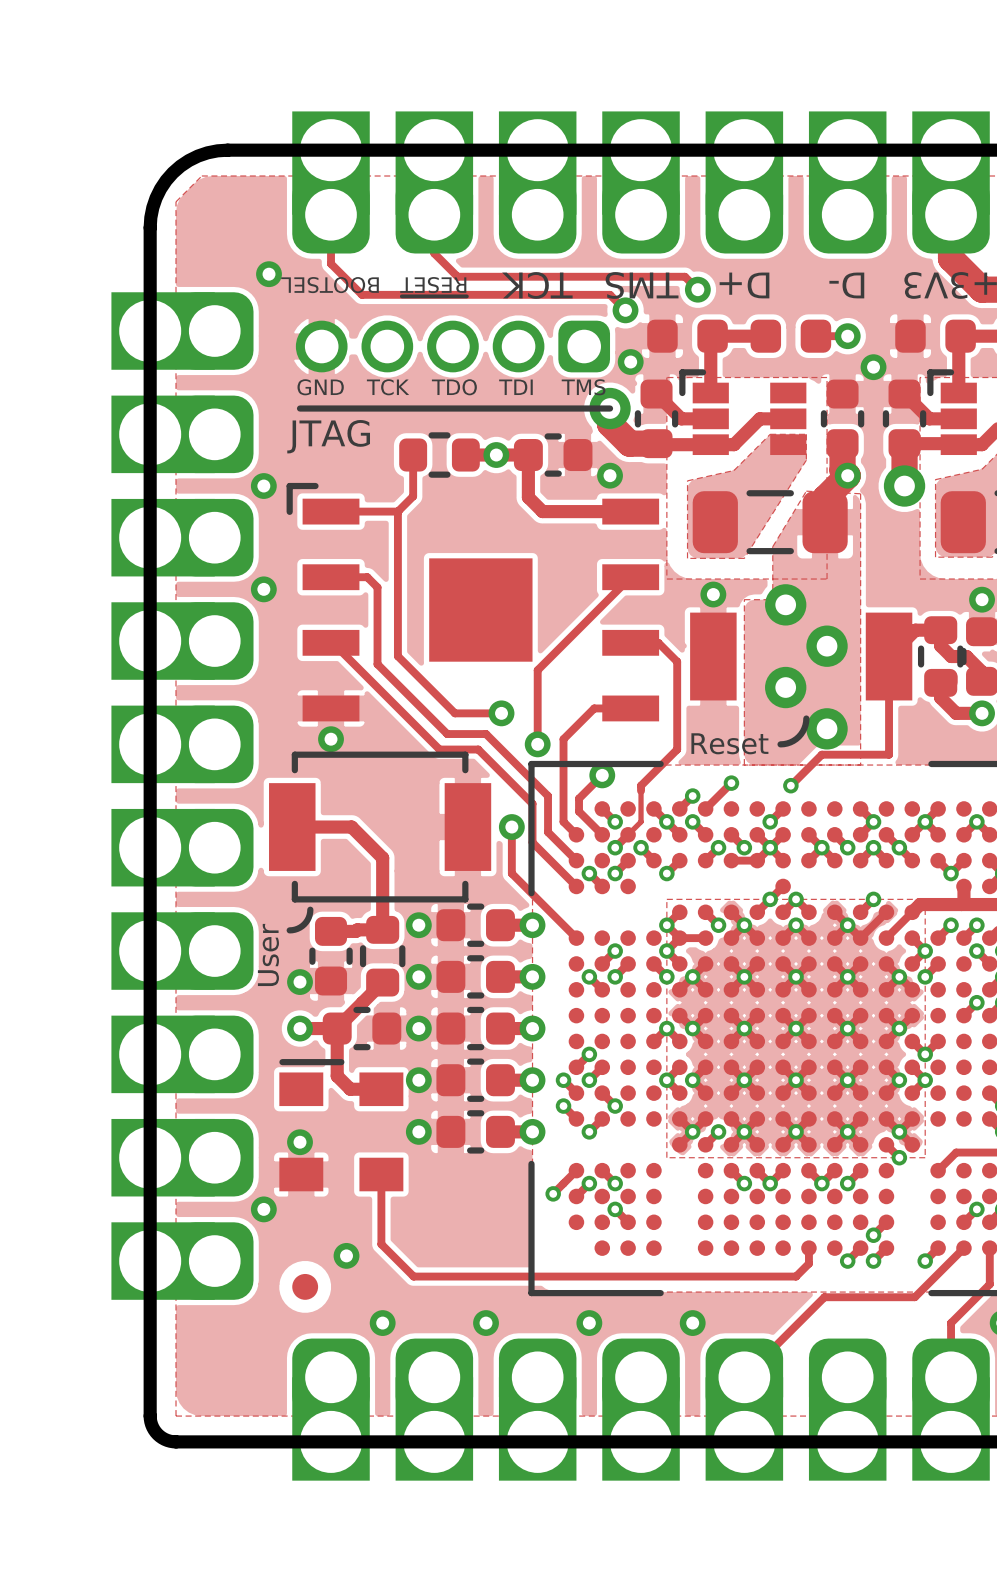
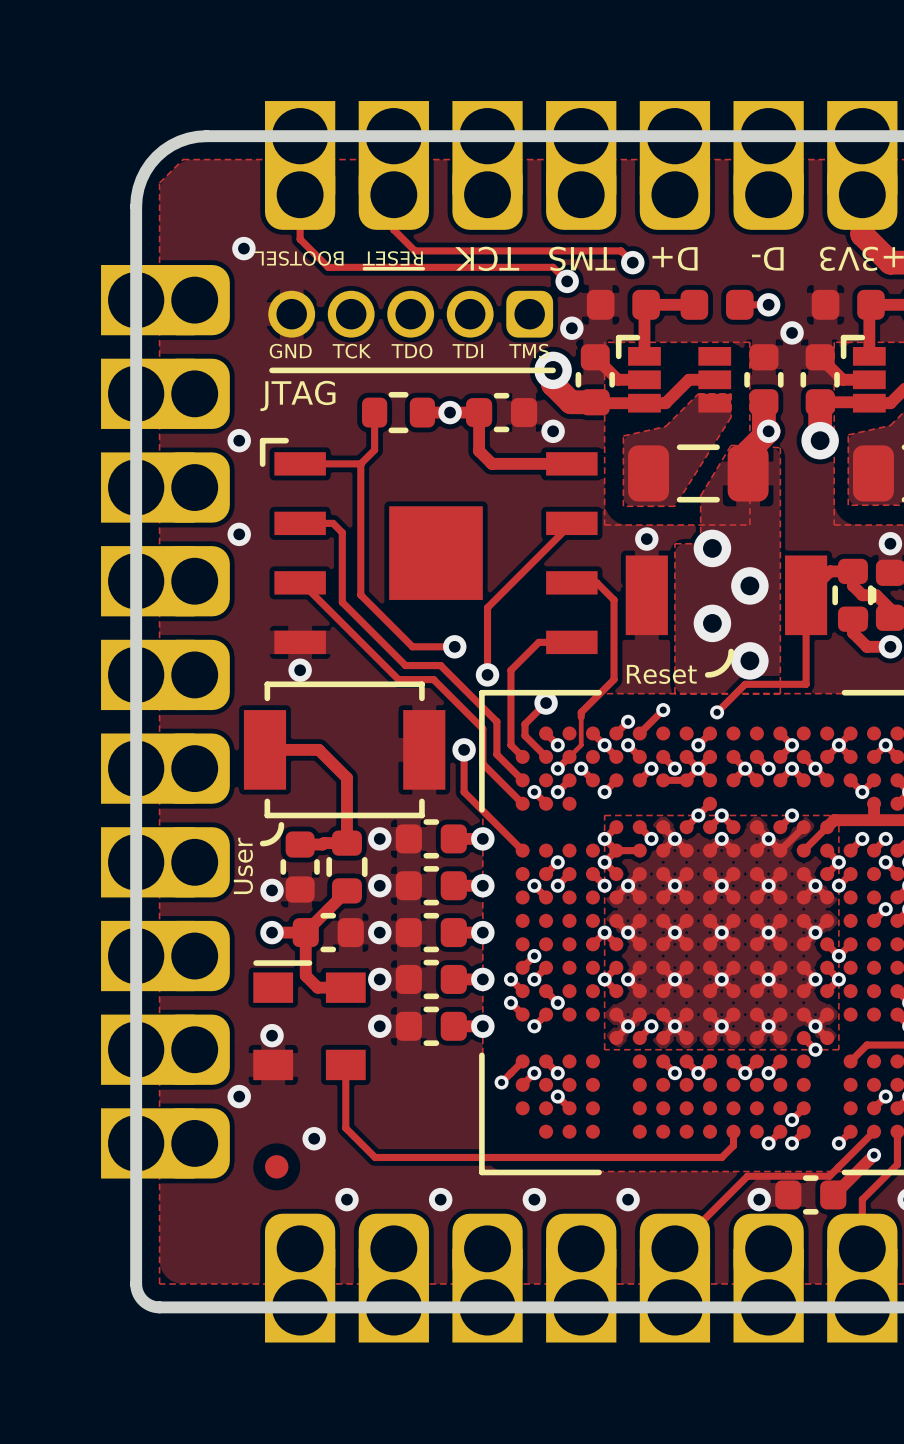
track: none -> (874, 1155) (834, 1194)
via: none -> (874, 1155)
part: none -> (810, 1194)
via: none -> (759, 1199)

